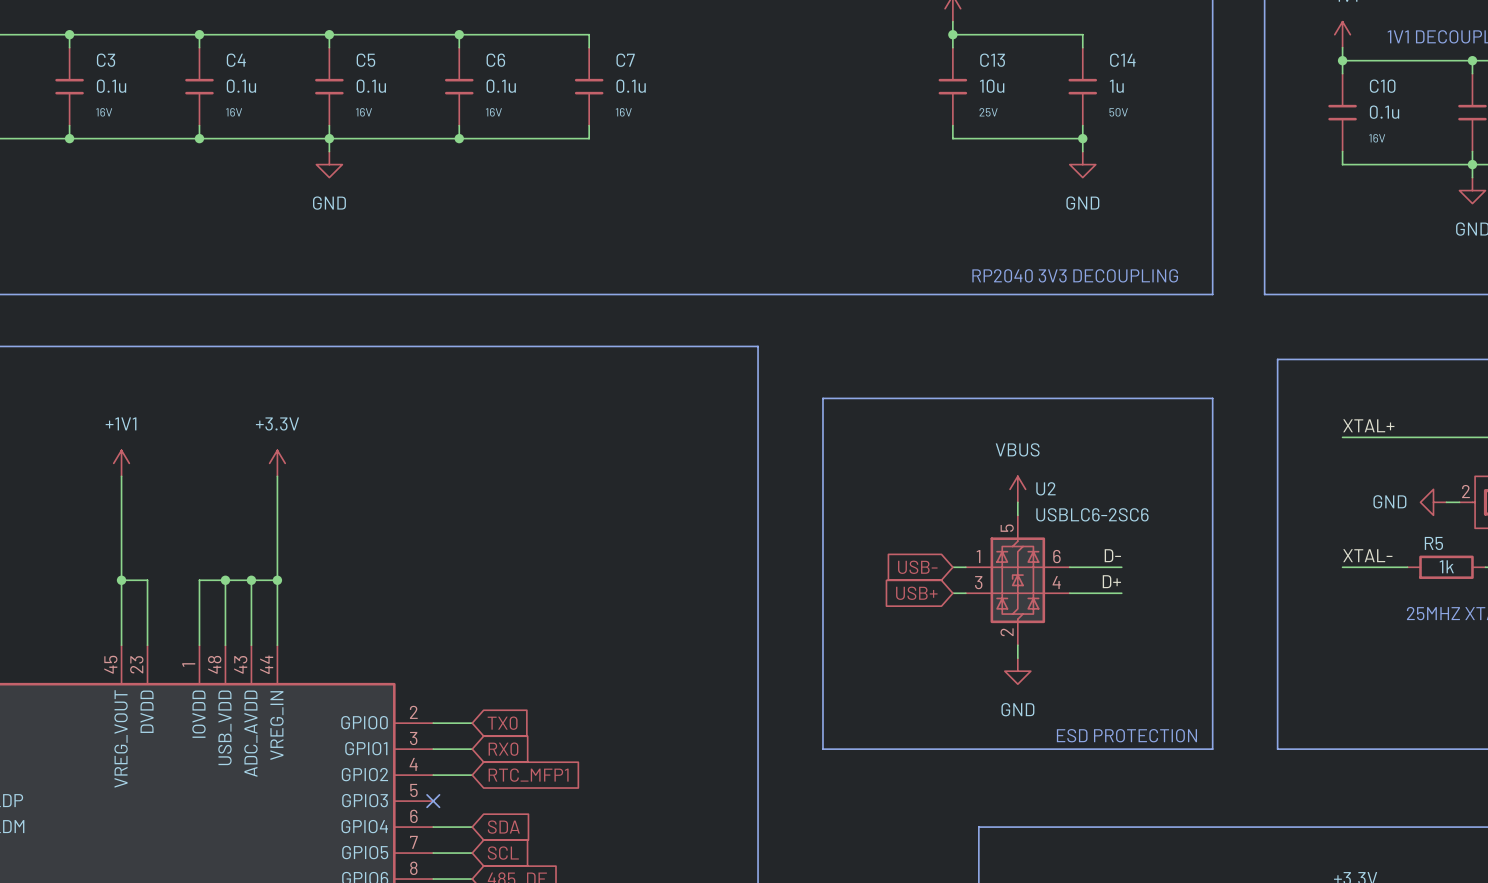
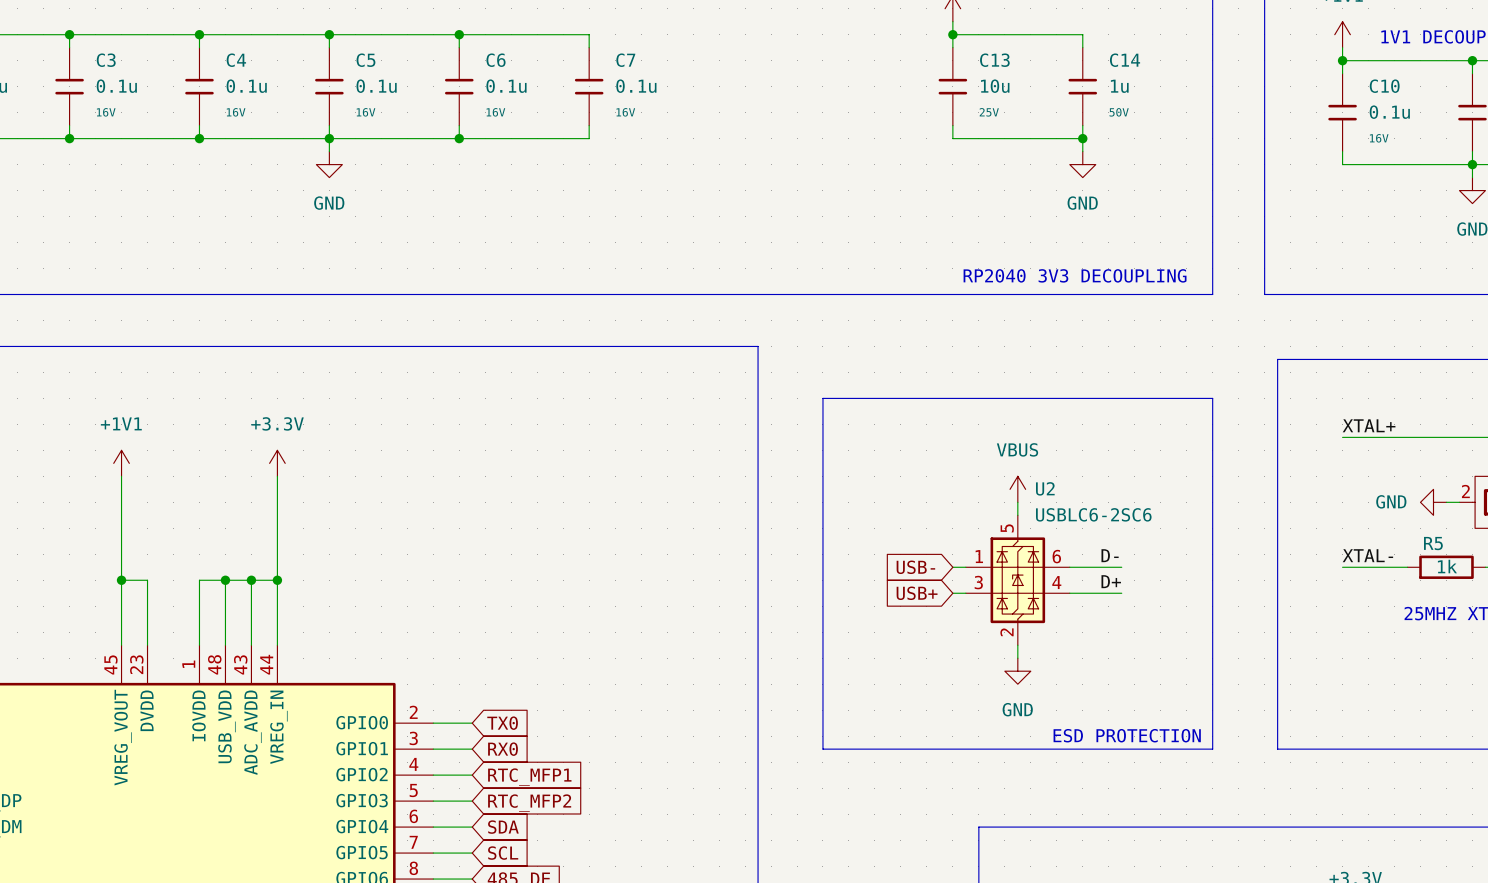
wire: none -> (433, 801) (472, 801)
no-connect mark: (433, 801) -> none
global label: none -> RTC_MFP2 (529, 803)

